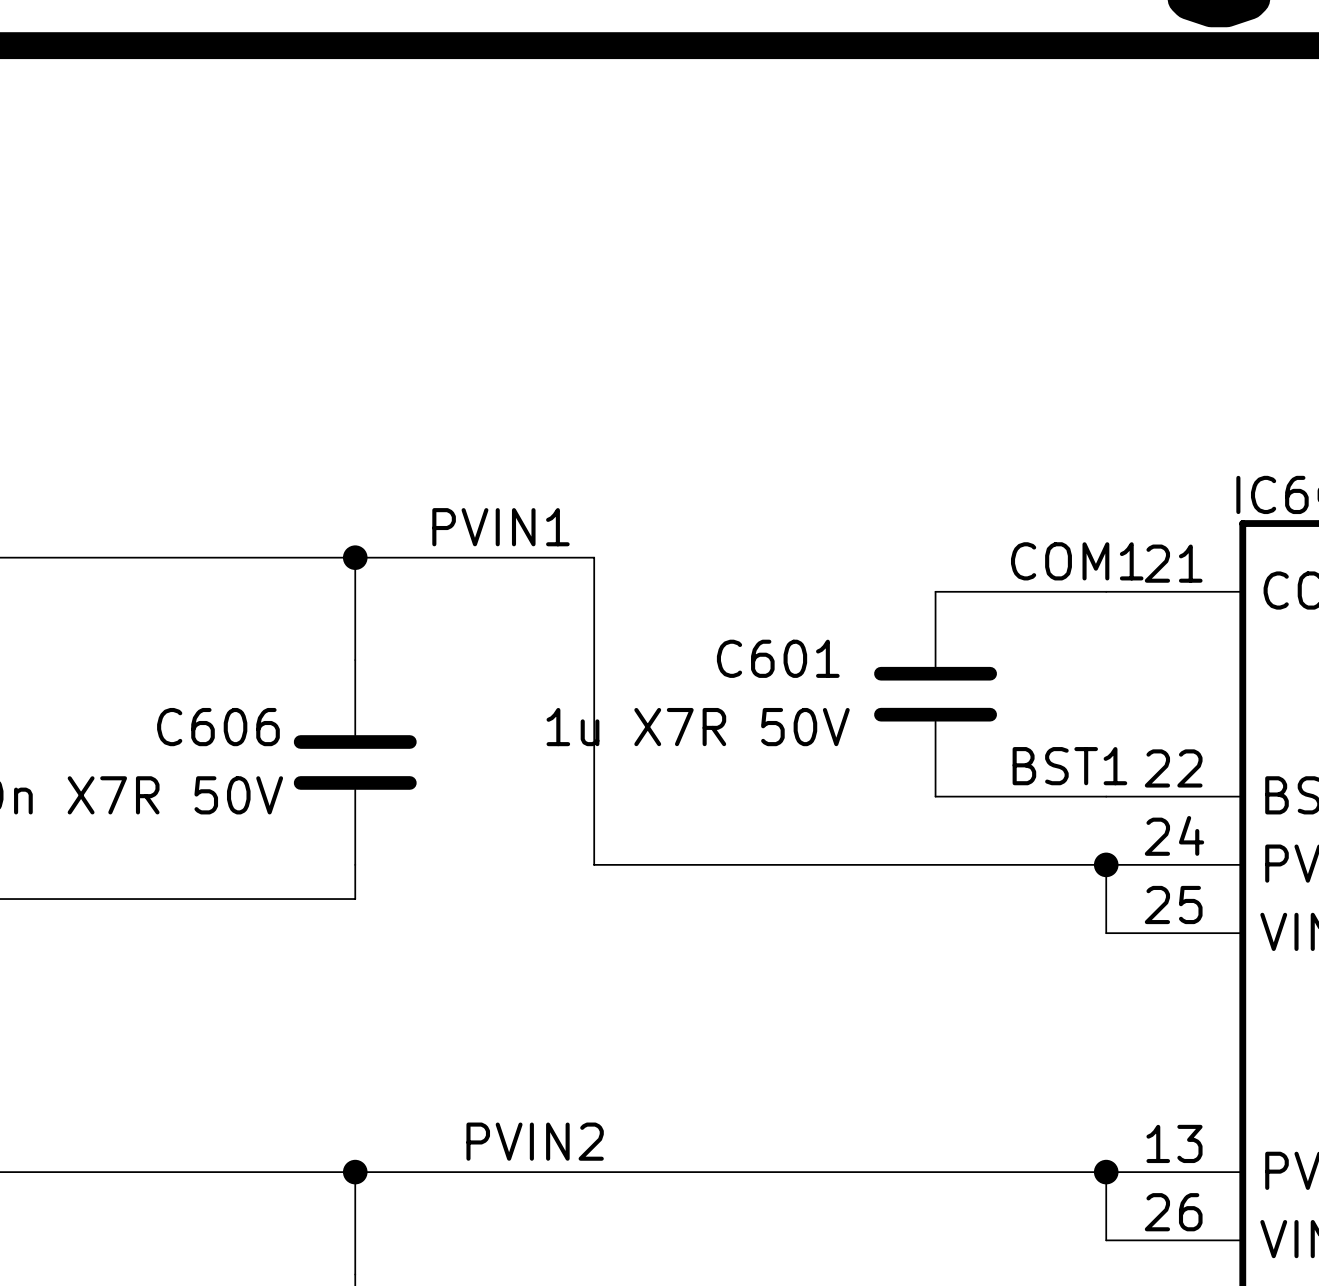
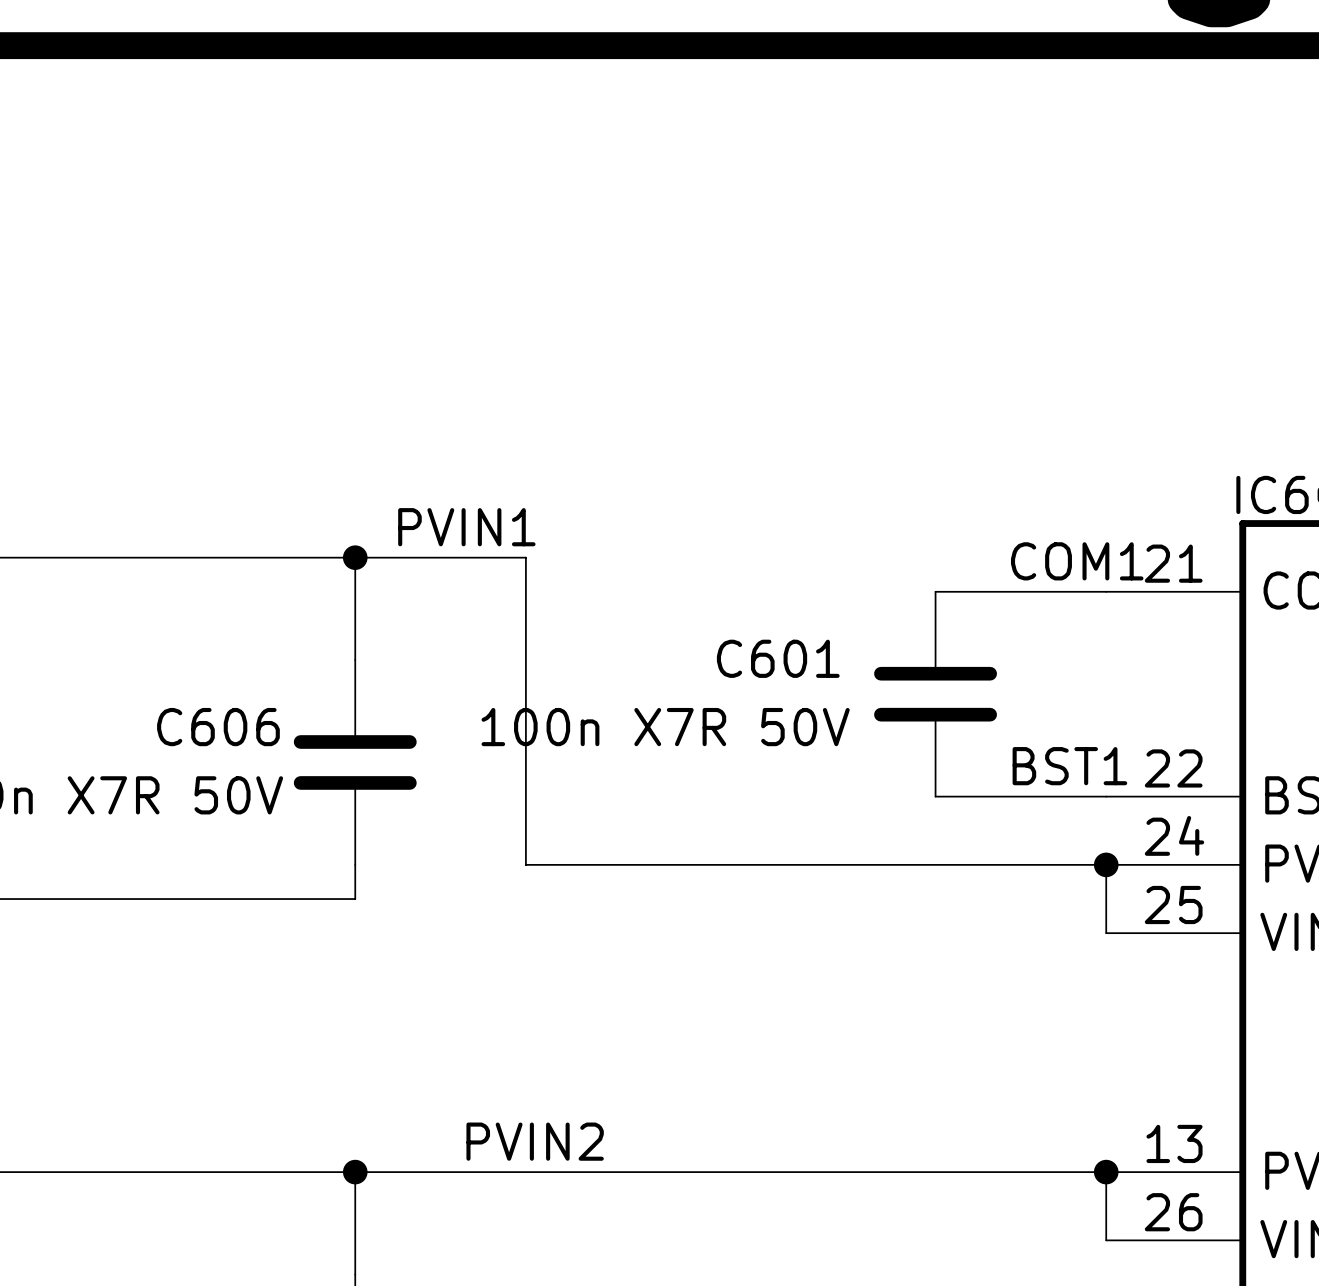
label position: PVIN1 (500, 527) -> PVIN1 (466, 527)
wire: (525, 557) (594, 557) (594, 864) -> (525, 557) (525, 864) (594, 864)
C601 value: 1u X7R 50V (698, 727) -> 100n X7R 50V (665, 727)

